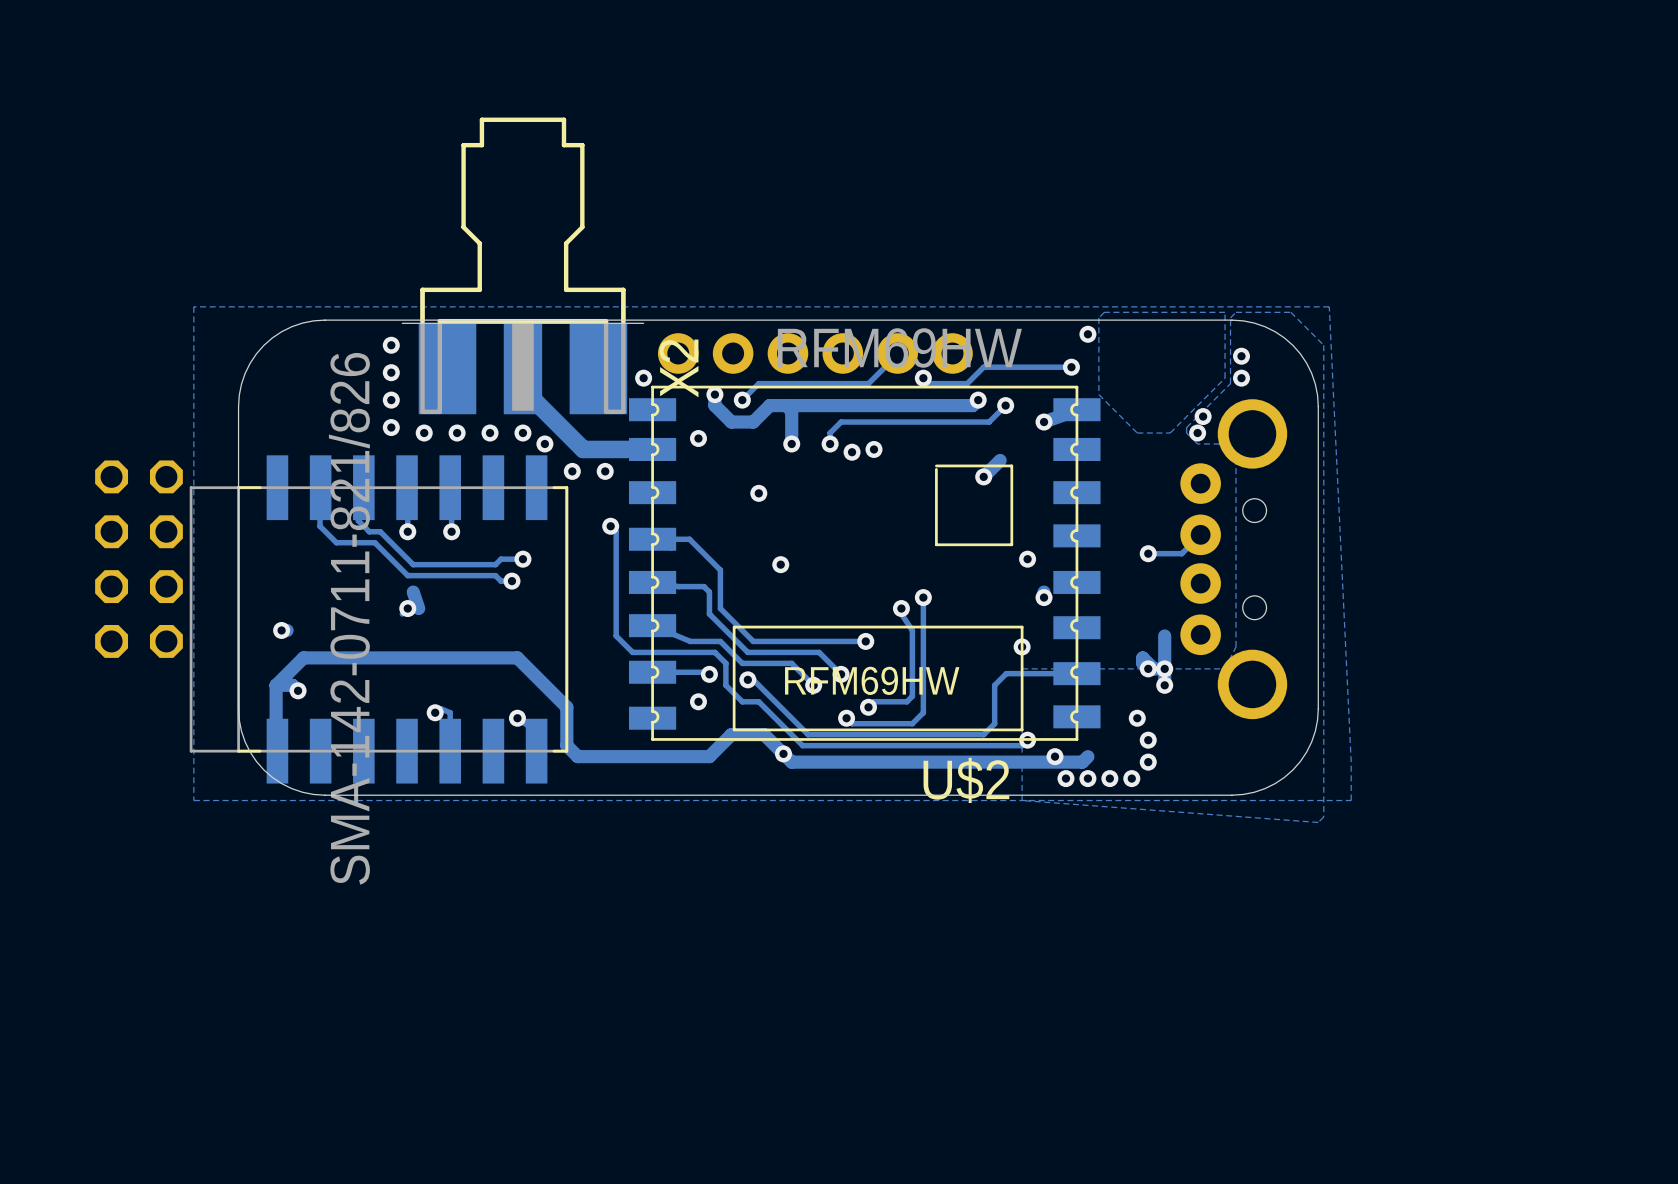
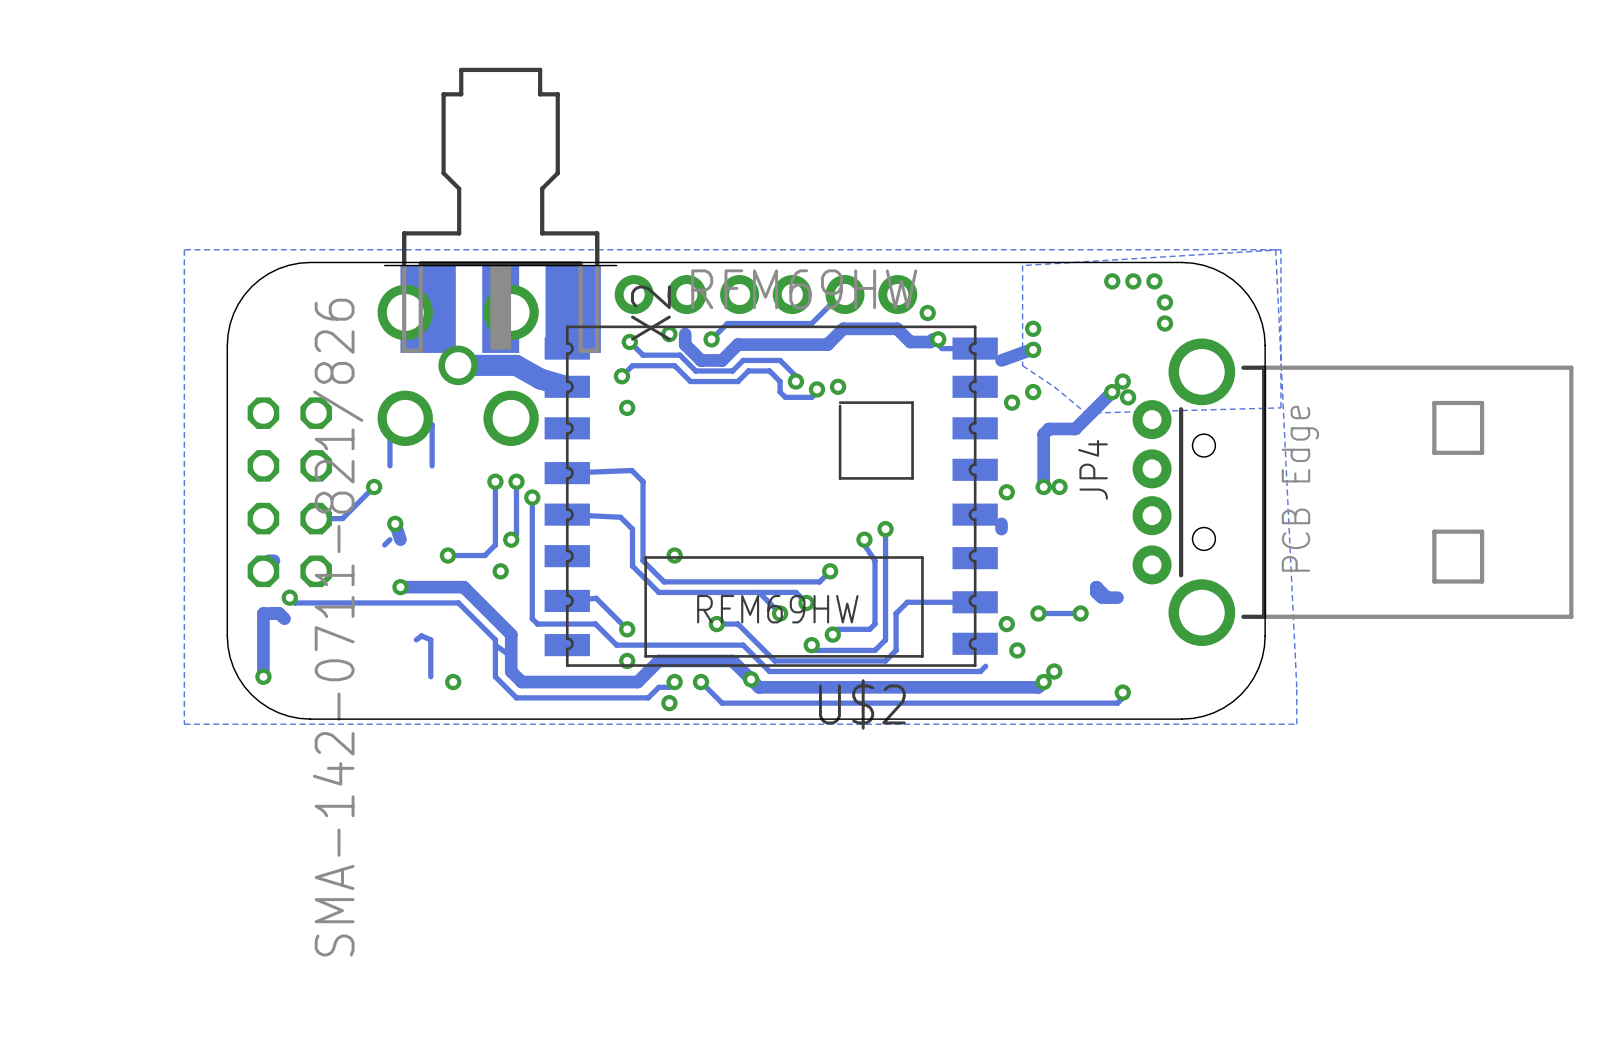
zone outline: none -> (1280, 249) (1280, 407) (1085, 413) (1054, 386) (1022, 365) (1022, 265) (1280, 249)
zone outline: (1225, 312) (1104, 312) (1098, 317) (1098, 394) (1137, 433) (1170, 433) (1225, 378) (1225, 312) -> none
zone outline: (1290, 312) (1236, 312) (1230, 317) (1230, 383) (1186, 427) (1186, 433) (1197, 443) (1219, 443) (1236, 460) (1236, 646) (1225, 668) (1022, 668) (1022, 800) (1318, 822) (1323, 816) (1323, 345) (1290, 312) -> none
via: (1087, 334) -> none
via: none -> (1112, 281)
via: none -> (1133, 281)
via: none -> (1154, 281)
via: (391, 345) -> none
part position: (815, 353) -> (765, 294)
track: (897, 353) (868, 383) (846, 383) -> (845, 294) (840, 294) (811, 323)
via: (1241, 356) -> none
via: none -> (1164, 302)
track: (1071, 367) (983, 367) (967, 383) (928, 383) (923, 378) -> none
via: (1071, 367) -> none
track: (522, 369) (528, 374) (528, 394) (583, 449) (652, 449) -> none
via: (391, 372) -> none
via: none -> (927, 313)
via: (643, 378) -> none
via: (923, 378) -> none
via: (1241, 378) -> none
via: none -> (1164, 323)
via: none -> (1033, 328)
via position: (714, 394) -> (669, 334)
via: (391, 400) -> none
track: (978, 400) (972, 405) (863, 405) -> (975, 347) (942, 348) (932, 339) (930, 341) (910, 341) (897, 328) (843, 328) (827, 344)
via: none -> (629, 341)
track: (786, 405) (791, 411) (791, 443) -> none
track: (1005, 405) (989, 422) (841, 422) (830, 433) (830, 438) -> (629, 341) (643, 355) (679, 355) (695, 370) (732, 370) (743, 360) (780, 360) (795, 376)
via: (1005, 405) -> none
via: none -> (1033, 349)
via: (1203, 416) -> none
via: (1044, 422) -> none
via: (391, 427) -> none
track: none -> (458, 365) (516, 365) (540, 378) (567, 386)
part: none -> (458, 365)
via: (424, 433) -> none
via: (457, 433) -> none
via: (490, 433) -> none
via: (522, 433) -> none
via: (1197, 433) -> none
track: none -> (621, 376) (632, 365) (674, 365) (690, 381) (737, 381) (748, 370) (769, 370) (780, 381) (780, 392) (785, 397) (811, 397) (817, 392)
via: none -> (621, 376)
via: (698, 438) -> none
via: (544, 443) -> none
via: (791, 443) -> none
via: none -> (1122, 381)
via: none -> (1033, 392)
track: none -> (1112, 392) (1075, 428) (1048, 428) (1043, 434) (1043, 486)
via: none -> (1112, 392)
track: (1000, 460) (983, 476) -> none
via: none -> (1128, 397)
via: none -> (1012, 402)
via: (572, 471) -> none
via: (605, 471) -> none
via: none -> (627, 407)
via: (983, 476) -> none
track: (320, 487) (320, 526) (336, 542) (374, 542) (407, 575) (495, 575) (501, 581) (511, 581) -> none
track: (363, 487) (358, 493) (358, 520) (369, 531) (380, 531) (413, 564) (495, 564) (501, 559) (522, 559) -> none
via: (758, 493) -> none
track: (610, 526) (616, 531) (616, 635) (632, 652) (692, 652) -> (643, 481) (643, 560) (664, 581)
via: (610, 526) -> none
via position: (407, 531) -> (374, 486)
via: (451, 531) -> none
track: (1200, 534) (1181, 553) (1148, 553) -> none
track: (659, 536) (652, 539) (689, 539) (720, 570) (720, 608) (753, 641) (865, 641) -> (785, 581) (819, 581) (830, 571)
track: none -> (631, 470) (567, 473)
track: none -> (495, 481) (495, 544) (484, 555) (447, 555)
via: none -> (495, 481)
track: none -> (516, 481) (516, 534) (511, 539)
via: none -> (516, 481)
track: none -> (374, 486) (342, 518) (316, 518)
via: none -> (1043, 486)
via: none -> (1059, 486)
via: (1148, 553) -> none
part position: (138, 559) -> (289, 492)
via: (522, 559) -> none
via: (1027, 559) -> none
via: none -> (1006, 492)
JP4 side: top (1233, 559) -> bottom (1352, 492)
U$2 position: (864, 563) -> (771, 496)
track: none -> (532, 497) (532, 618) (537, 624) (595, 624) (616, 645) (743, 645)
via: none -> (532, 497)
via: (780, 564) -> none
via: (511, 581) -> none
track: (652, 582) (678, 586) (703, 586) (709, 592) (709, 614) (747, 652) -> none
via: (1044, 597) -> none
via position: (407, 608) -> (395, 523)
via: none -> (511, 539)
part: (378, 619) -> none
via: none -> (447, 555)
via: none -> (674, 555)
track: (652, 625) (690, 641) (720, 641) (742, 663) -> (567, 514) (620, 517) (632, 529) (632, 566) (658, 592) (711, 592)
via: (281, 630) -> none
track: (1164, 635) (1164, 685) -> none
via: none -> (500, 571)
via: (1022, 646) -> none
track: (714, 652) (725, 663) (725, 685) (742, 701) (758, 701) (775, 718) -> (685, 581) (716, 581)
track: (819, 652) (830, 663) -> (759, 592) (795, 592)
track: (418, 657) (303, 657) (276, 685) -> none
via: none -> (400, 587)
track: (484, 657) (517, 657) (566, 707) (566, 745) (577, 756) -> (463, 587) (511, 634) (511, 671) (521, 682) (553, 682)
track: none -> (289, 597) (295, 602) (458, 602) (495, 639) (495, 676) (516, 697) (648, 697) (658, 687) (669, 687) (674, 682)
via: none -> (289, 597)
via: (1148, 668) -> none
via: (1164, 668) -> none
track: none -> (567, 600) (596, 598) (627, 629)
track: (652, 672) (707, 672) (709, 674) -> none
track: (1006, 673) (994, 685) (994, 723) (983, 734) (923, 734) -> (965, 602) (907, 602) (896, 613) (896, 650) (885, 660)
track: (1076, 673) (1016, 673) -> none
via: (709, 674) -> none
track: (747, 679) (753, 679) (769, 696) -> (716, 624) (737, 624)
via position: (747, 679) -> (716, 624)
via: none -> (1038, 613)
track: none -> (1080, 613) (1038, 613)
via: none -> (1080, 613)
via: (1164, 685) -> none
via: (298, 690) -> none
via: none -> (1006, 624)
via: none -> (627, 629)
via: (698, 701) -> none
via: (435, 712) -> none
via: (517, 718) -> none
via: (1137, 718) -> none
via: none -> (1017, 650)
via: none -> (627, 660)
track: (731, 734) (709, 756) (665, 756) -> (701, 660) (658, 660) (637, 682)
via: (1027, 740) -> none
via: (1148, 740) -> none
via: none -> (1054, 671)
via: none -> (263, 676)
via: none -> (453, 682)
via: none -> (674, 682)
track: none -> (701, 682) (722, 703) (1117, 703) (1122, 697) (1122, 692)
via: none -> (701, 682)
via: (1055, 756) -> none
via: none -> (1043, 682)
via: (1148, 762) -> none
via: none -> (1122, 692)
via: none -> (669, 703)
via: (1065, 778) -> none
via: (1087, 778) -> none
via: (1109, 778) -> none
via: (1131, 778) -> none

